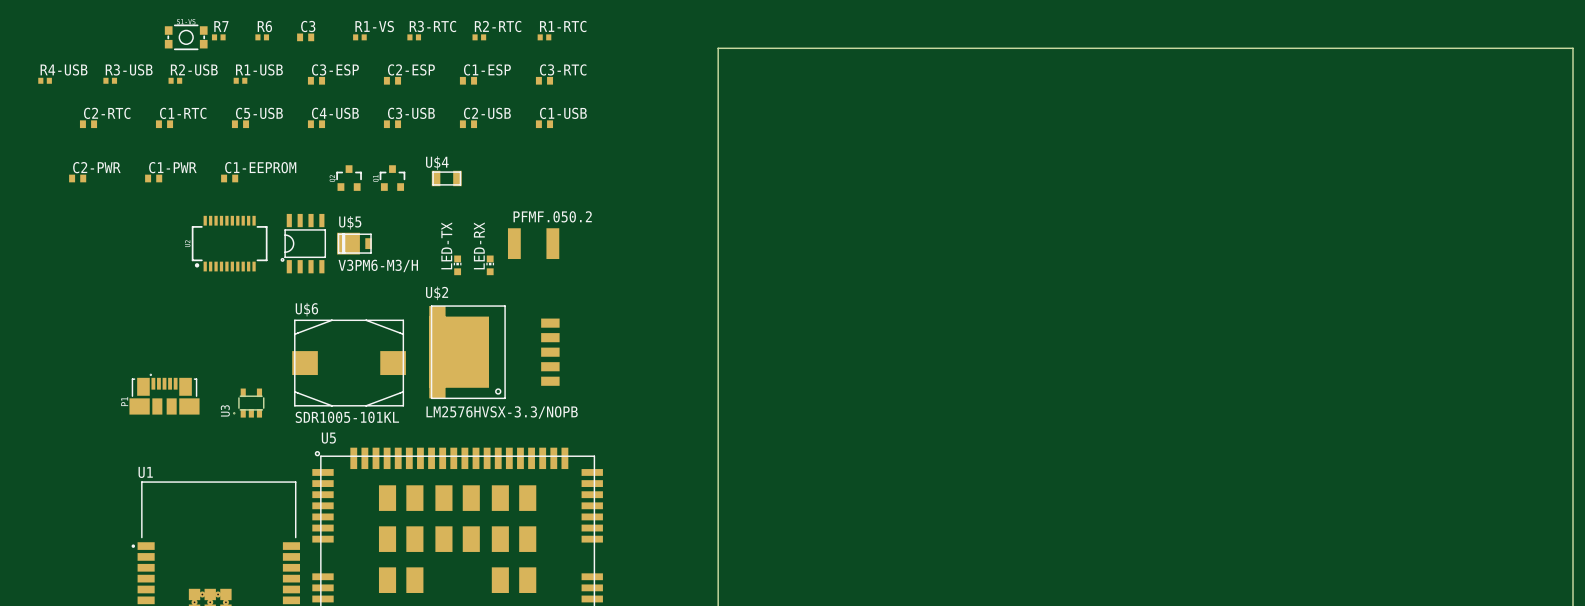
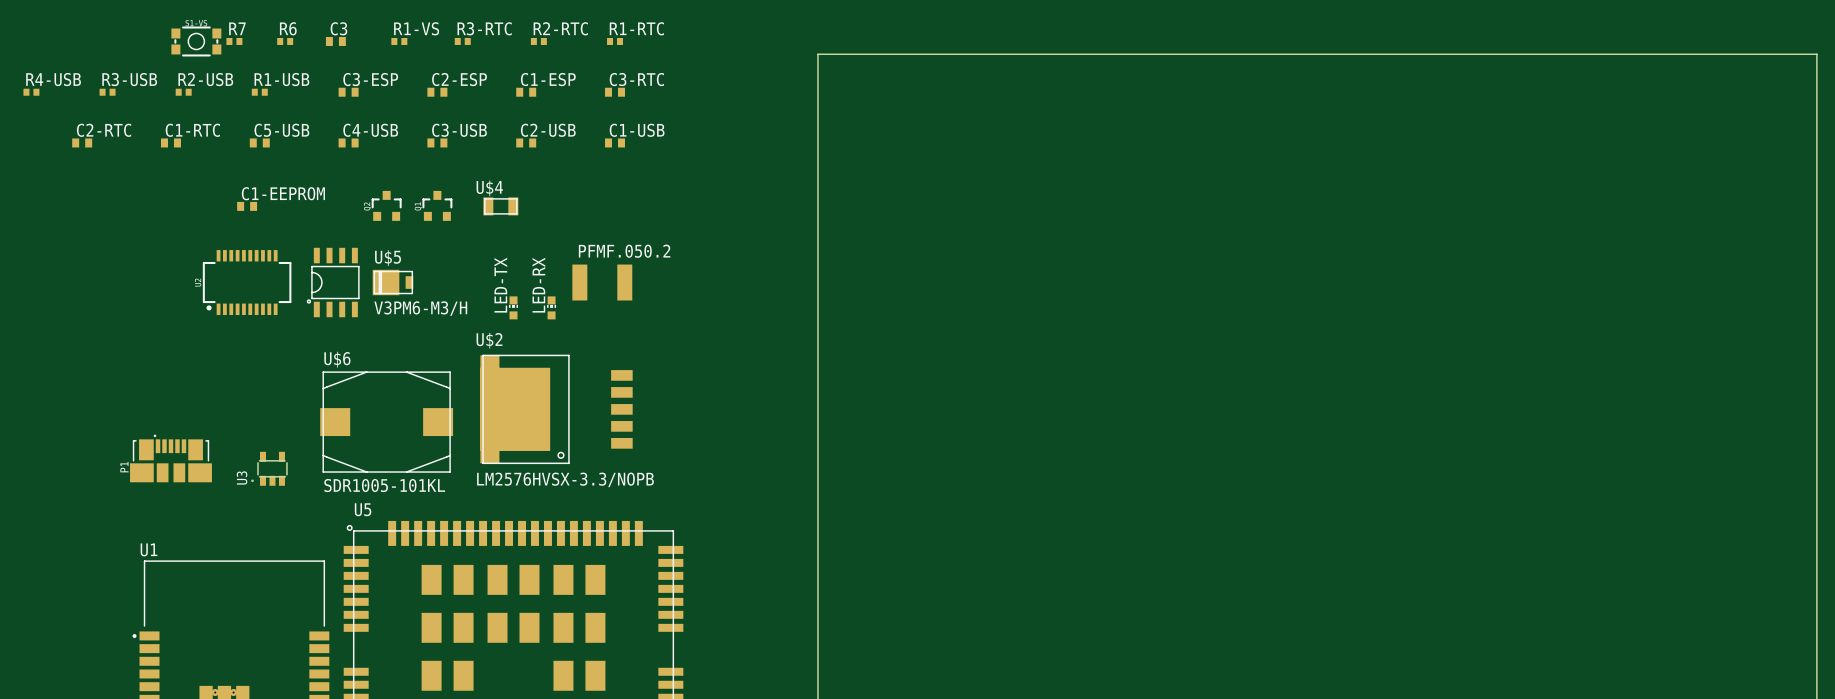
C2-PWR: (77, 178) -> none
C1-PWR: (153, 178) -> none

